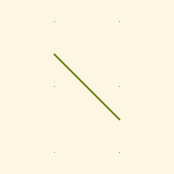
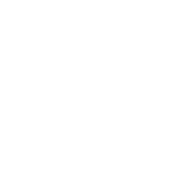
wire: (54, 54) (119, 119) -> none

